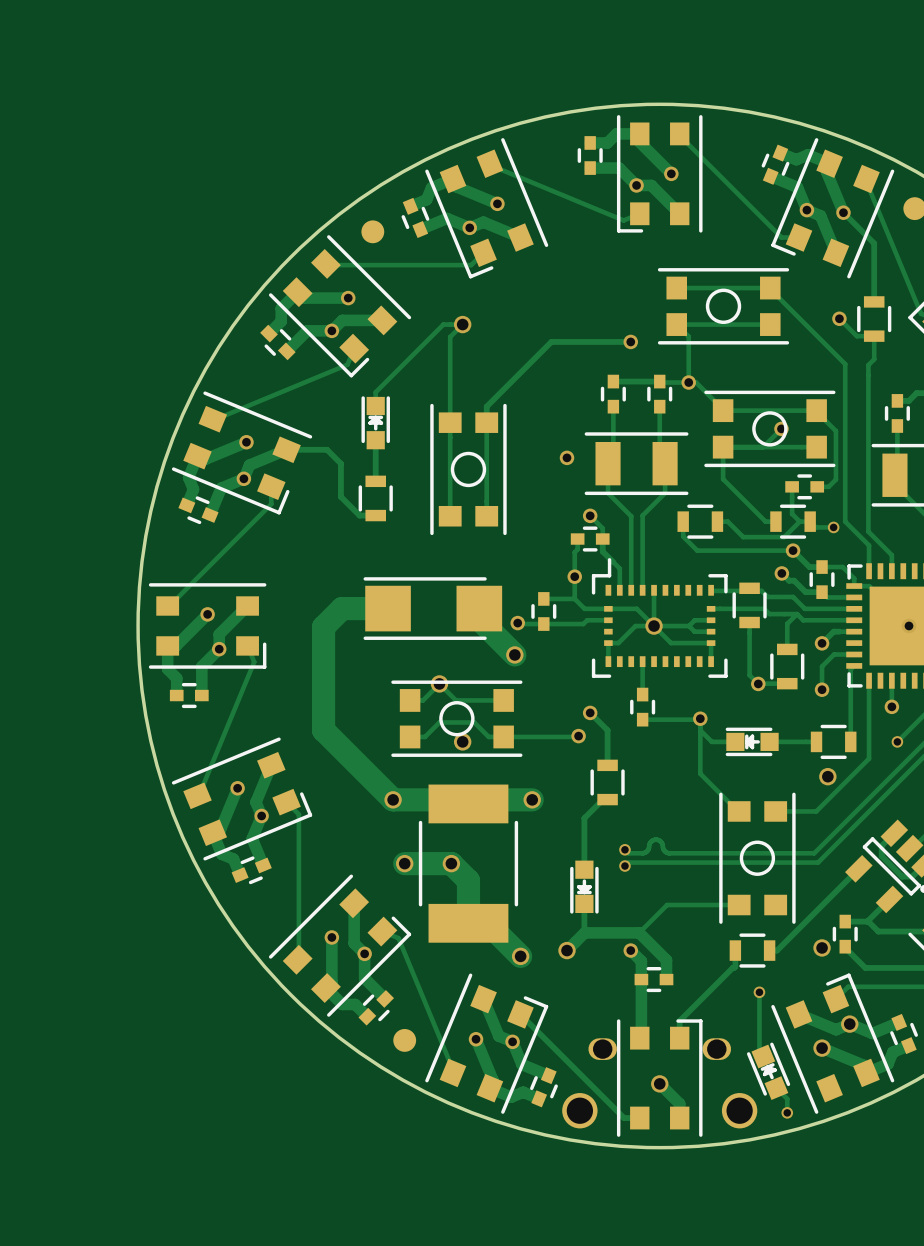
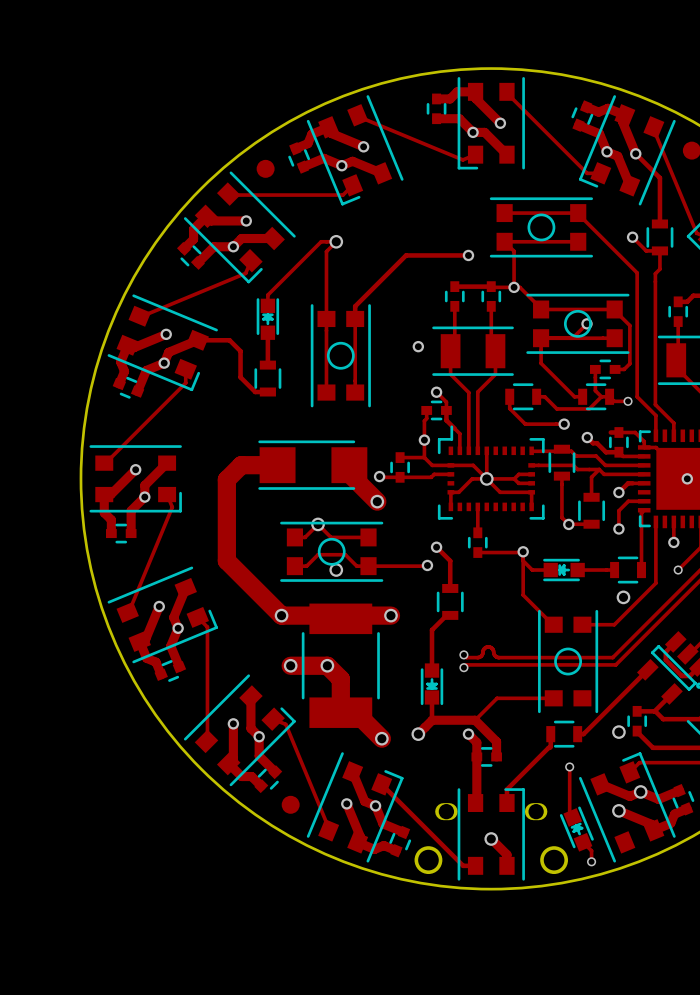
track: (697, 550) (793, 550) (811, 567) -> (520, 419) (525, 424) (564, 424)
via position: (793, 550) -> (564, 424)

